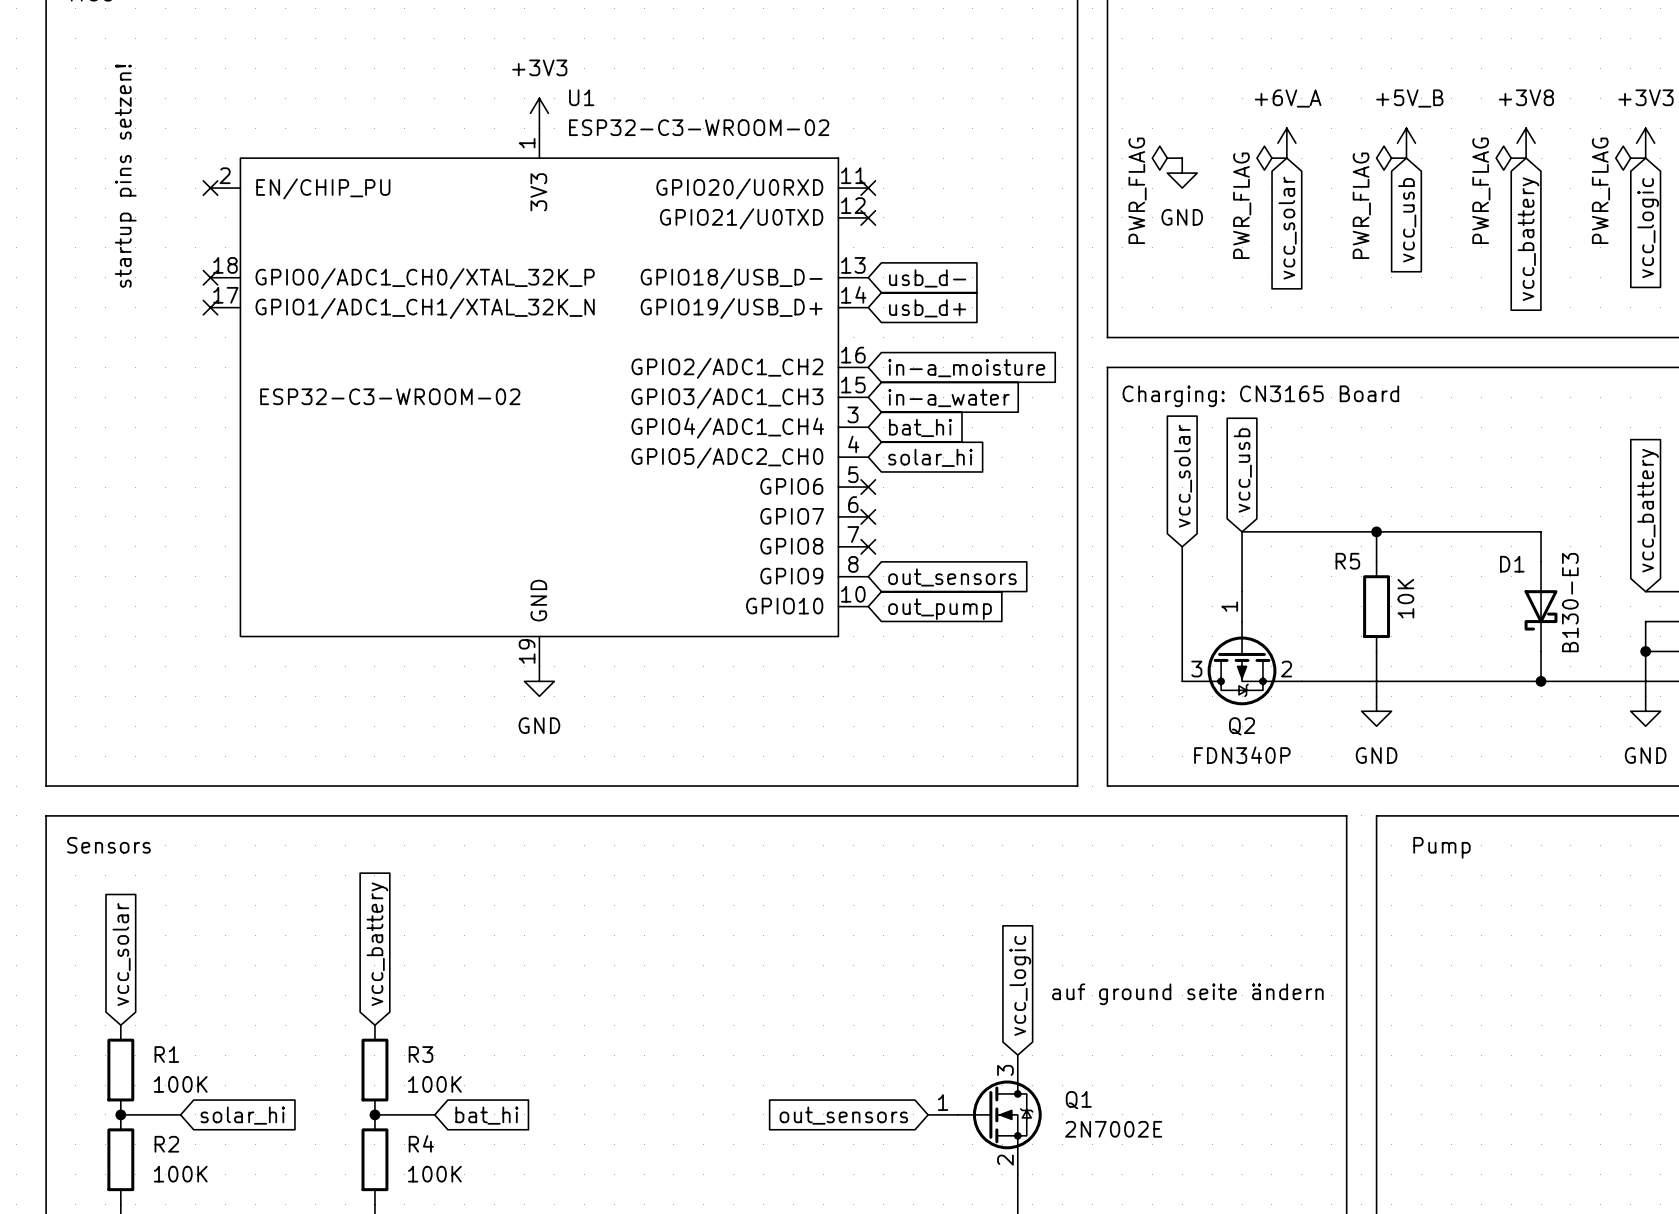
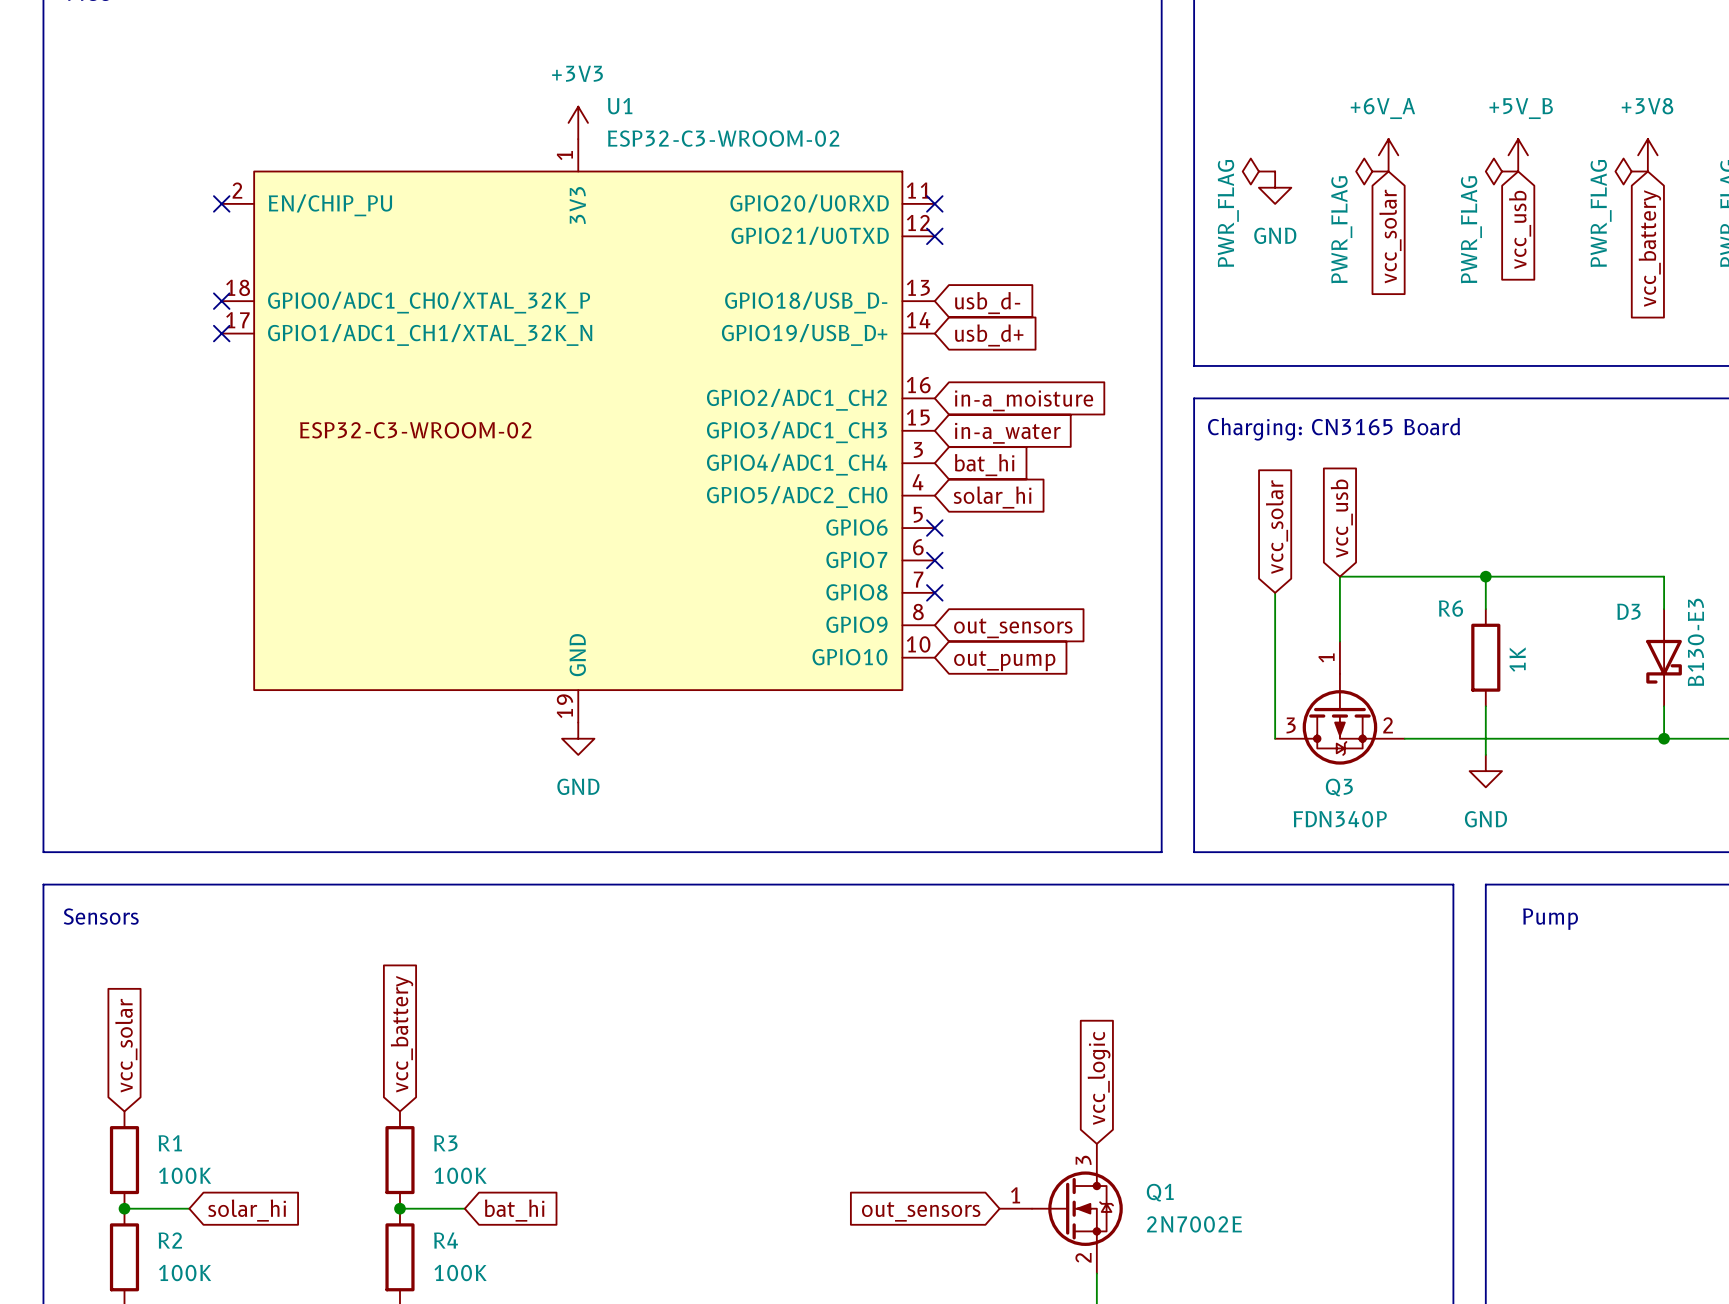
text: startup pins setzen! (125, 176) -> none
R5 name: R5 (1347, 561) -> R6 (1450, 608)
D1 name: D1 (1512, 564) -> D3 (1628, 611)
R5 value: 10K (1405, 598) -> 1K (1517, 659)
Q2 name: Q2 (1242, 726) -> Q3 (1339, 787)
text: auf ground seite ändern (1187, 994) -> none

